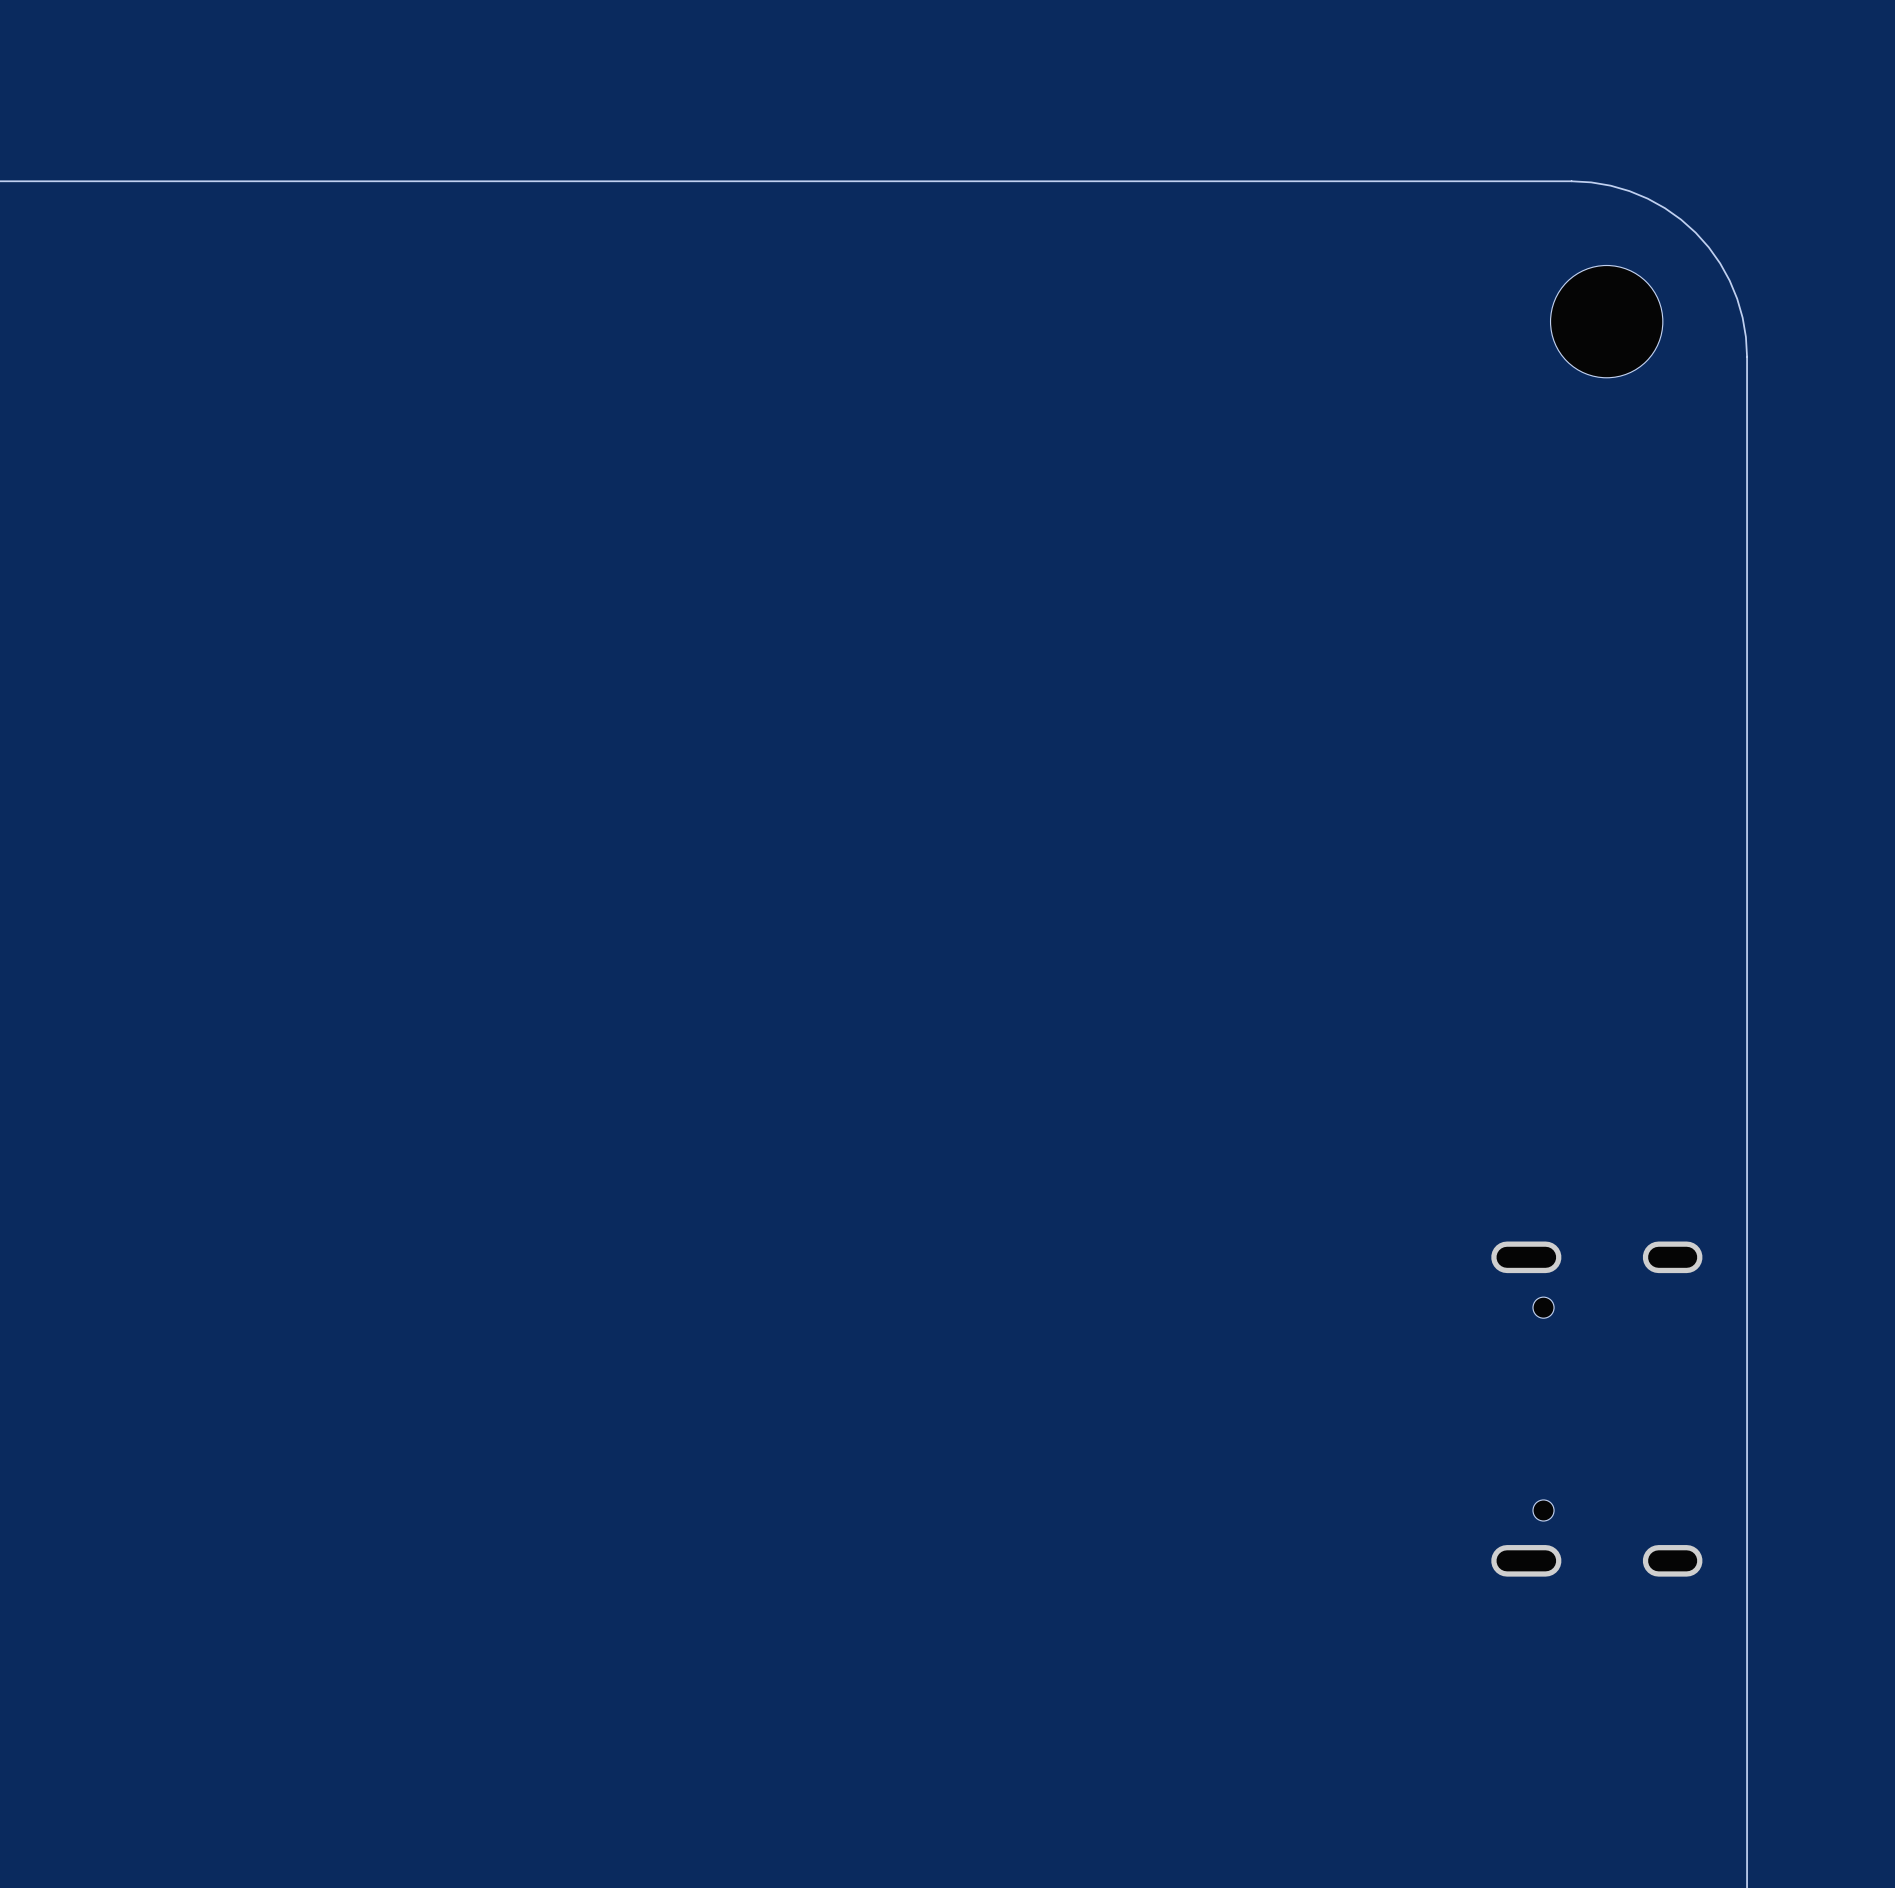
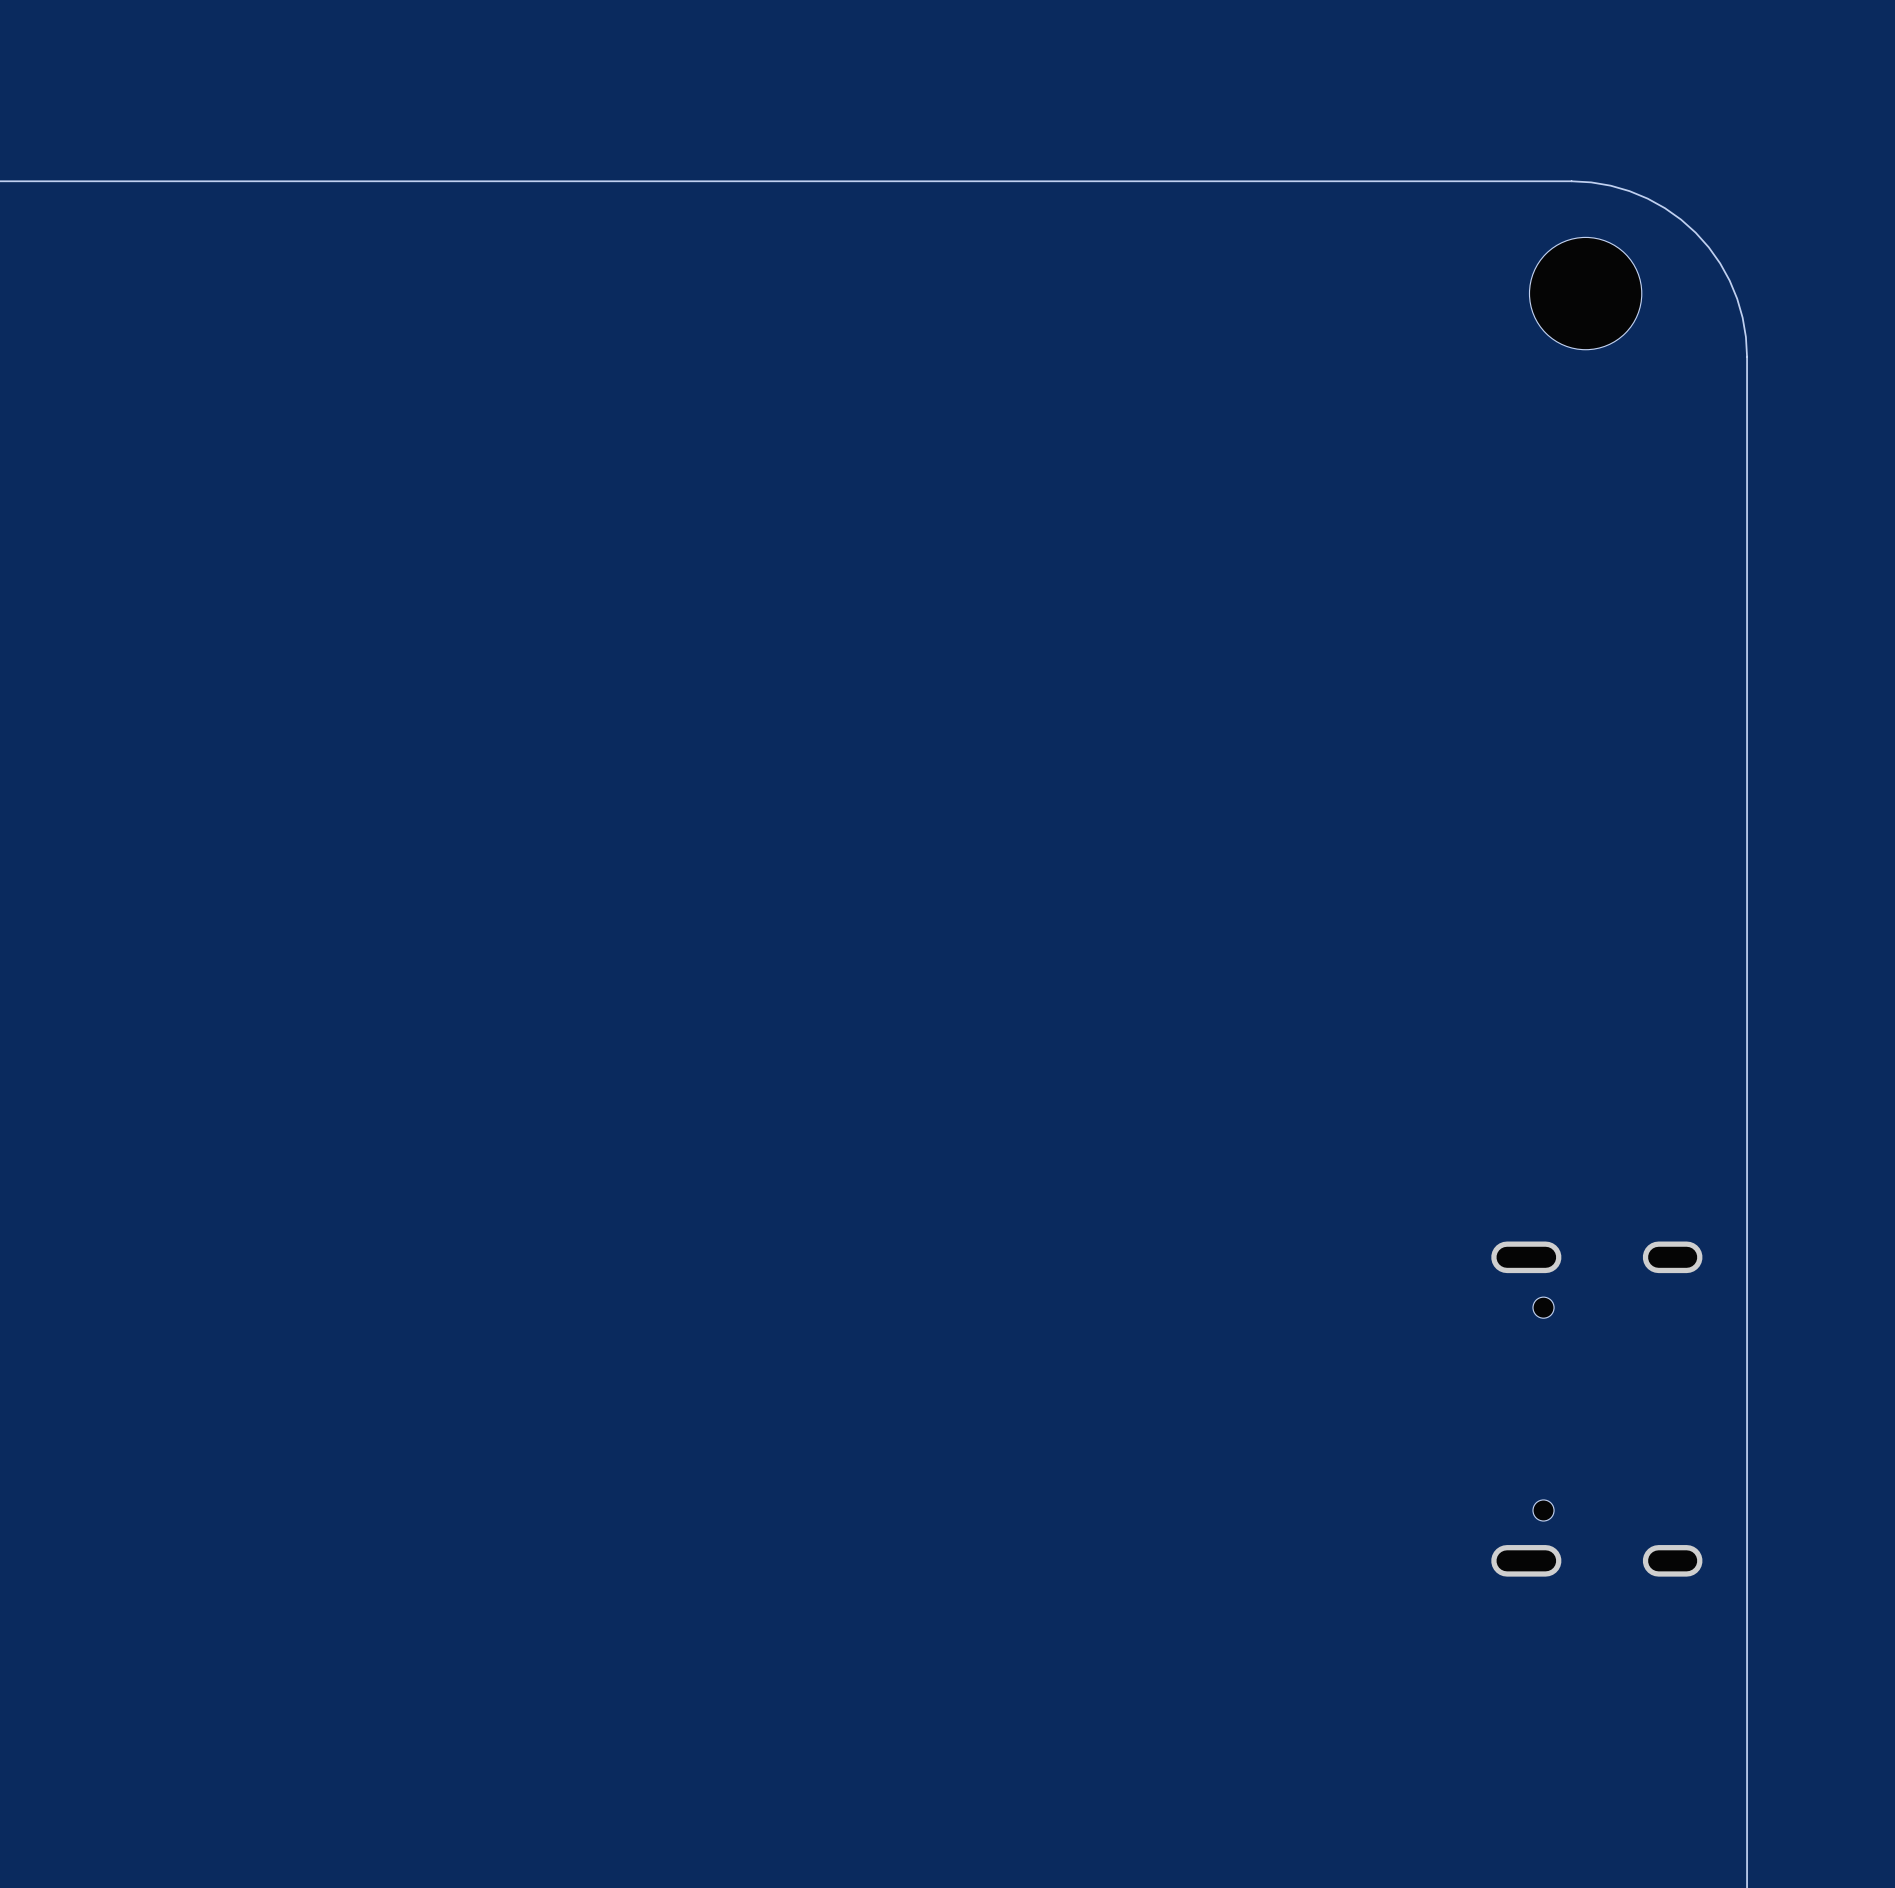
part position: (1606, 321) -> (1585, 293)

